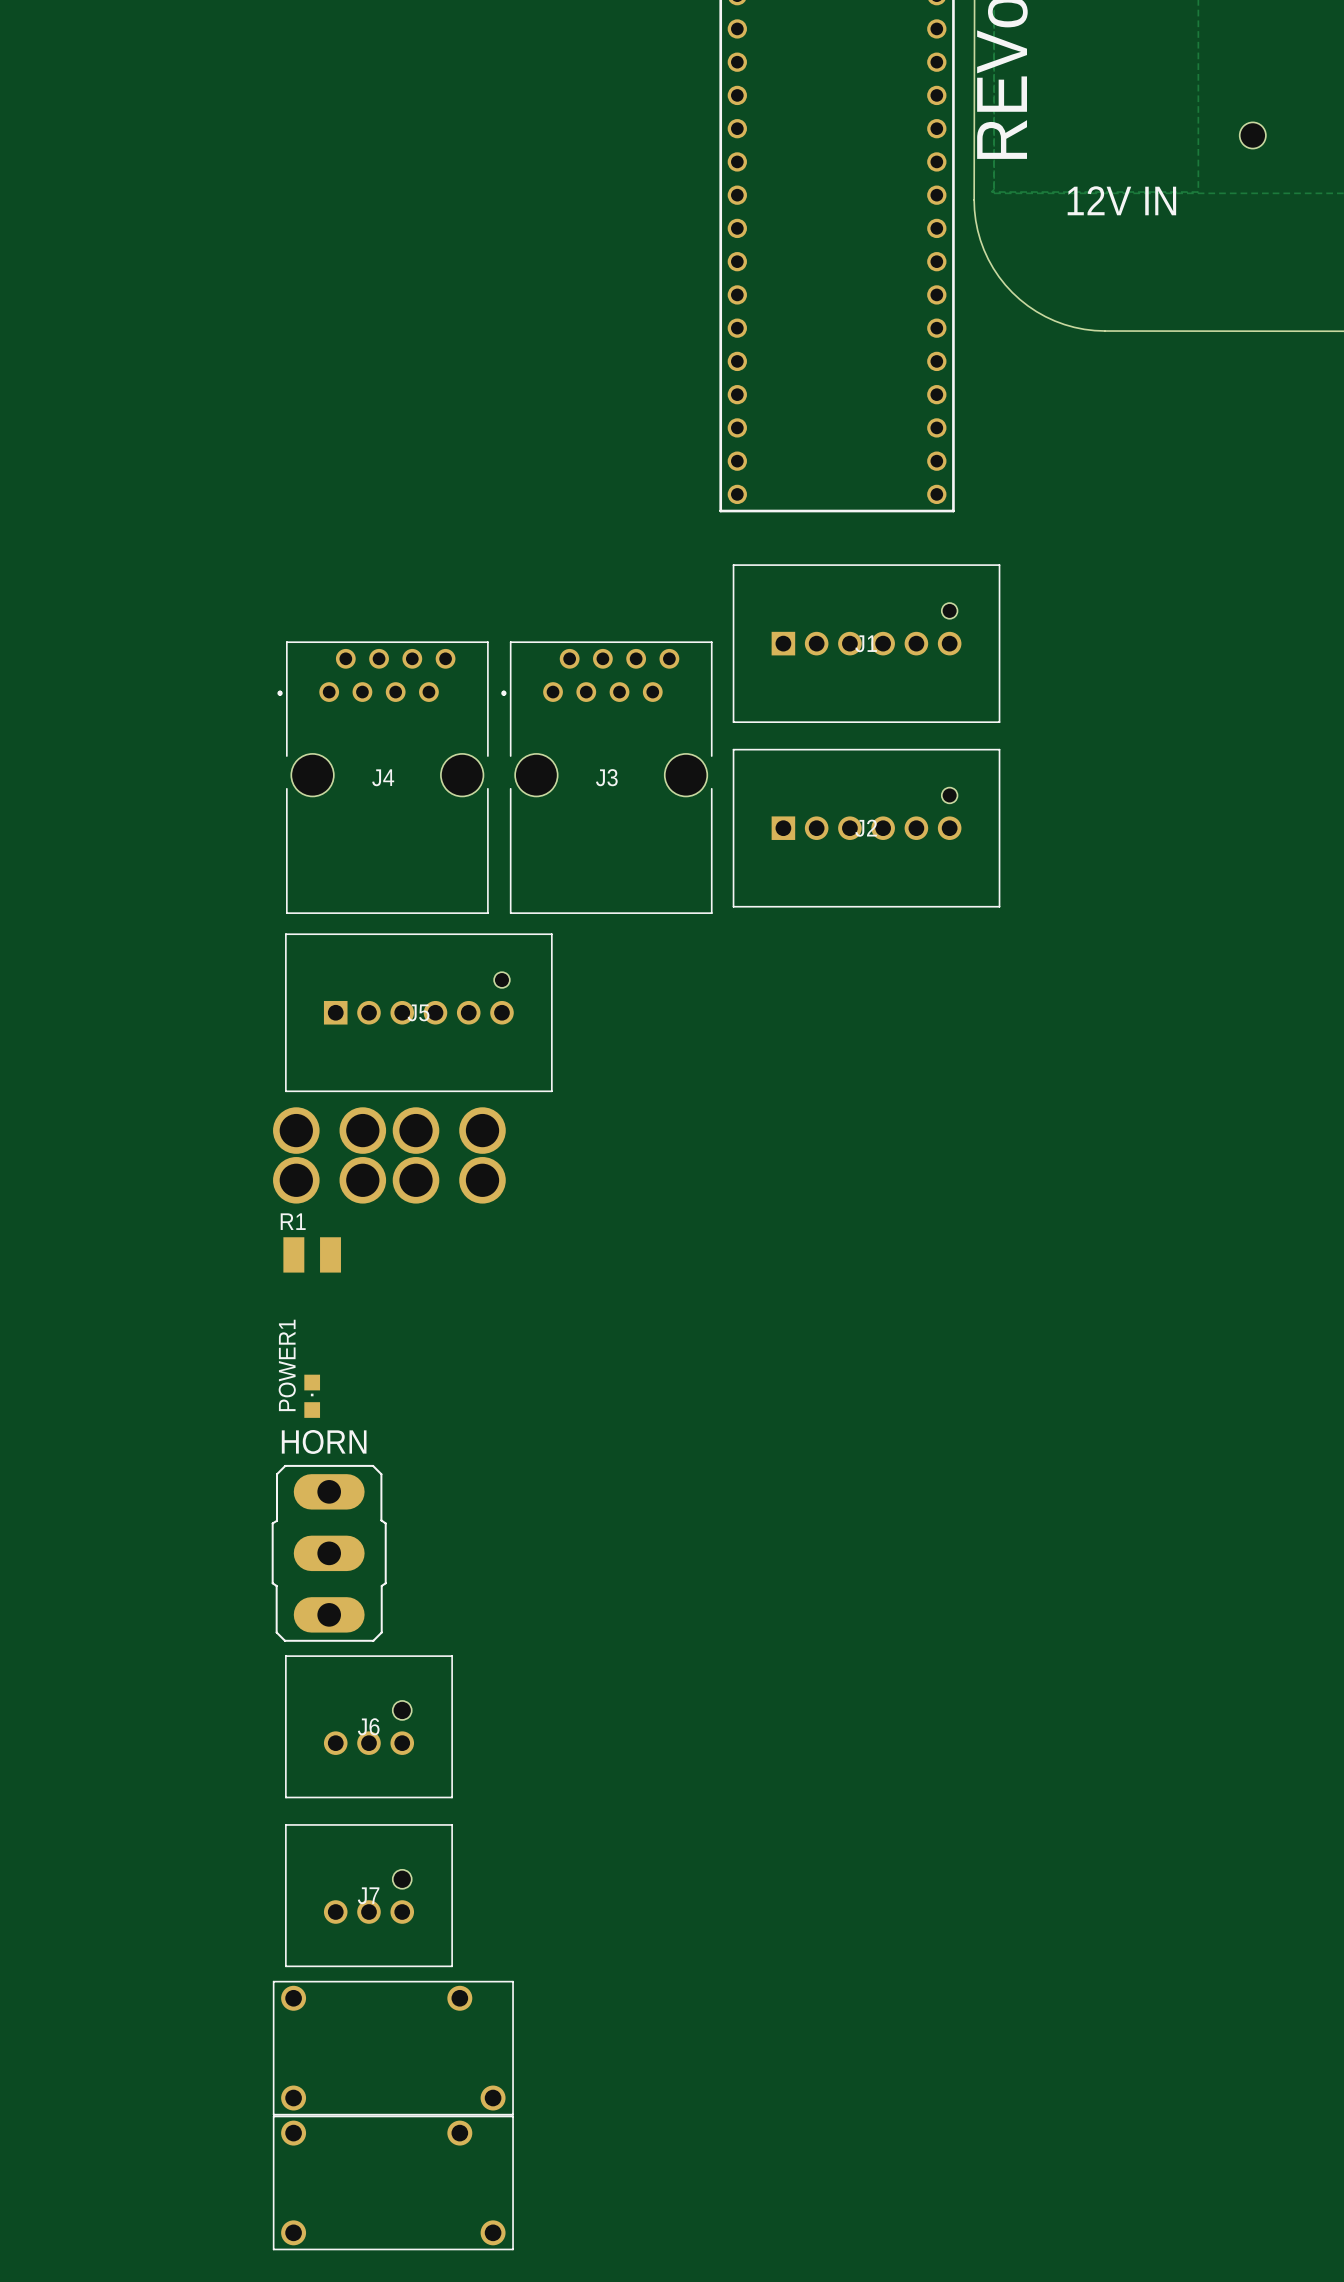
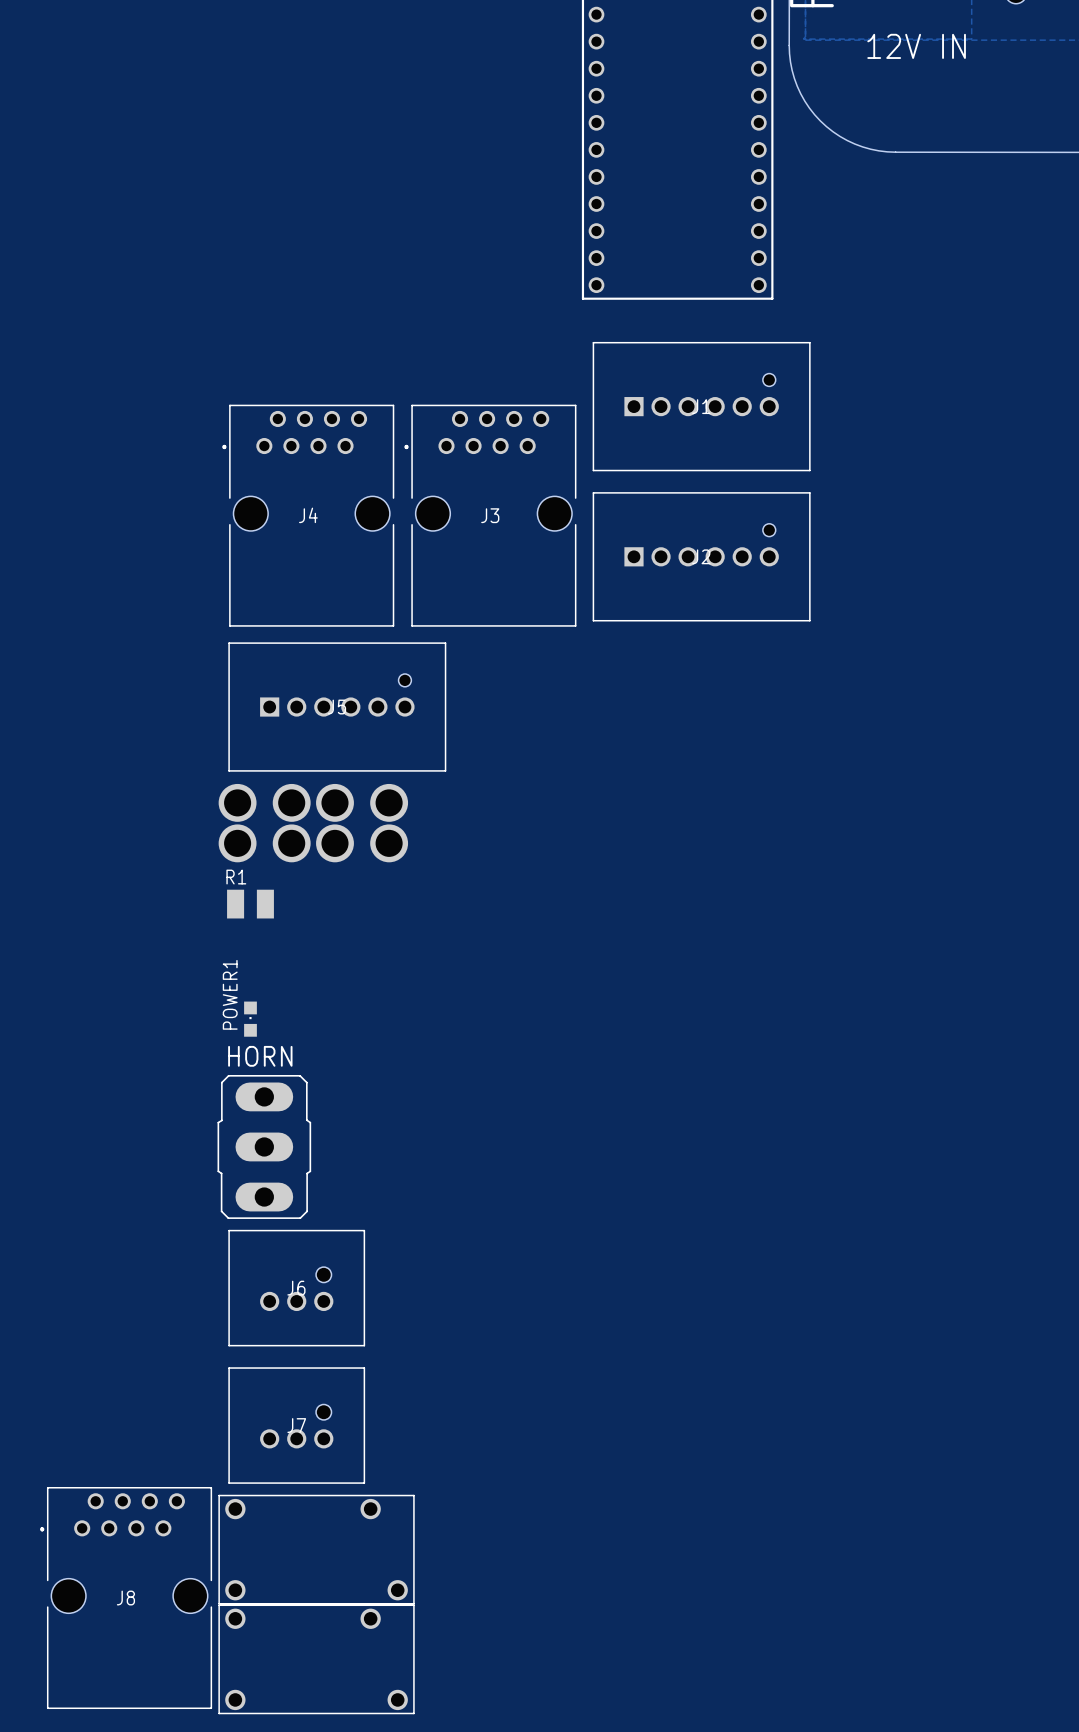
J8: none -> (125, 1598)

